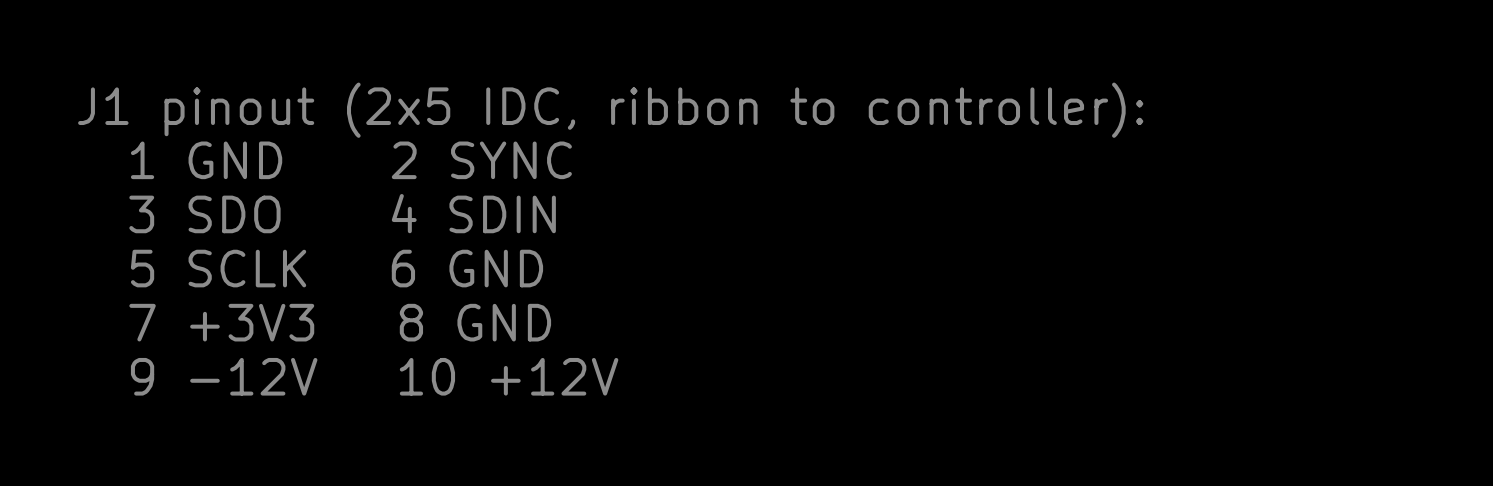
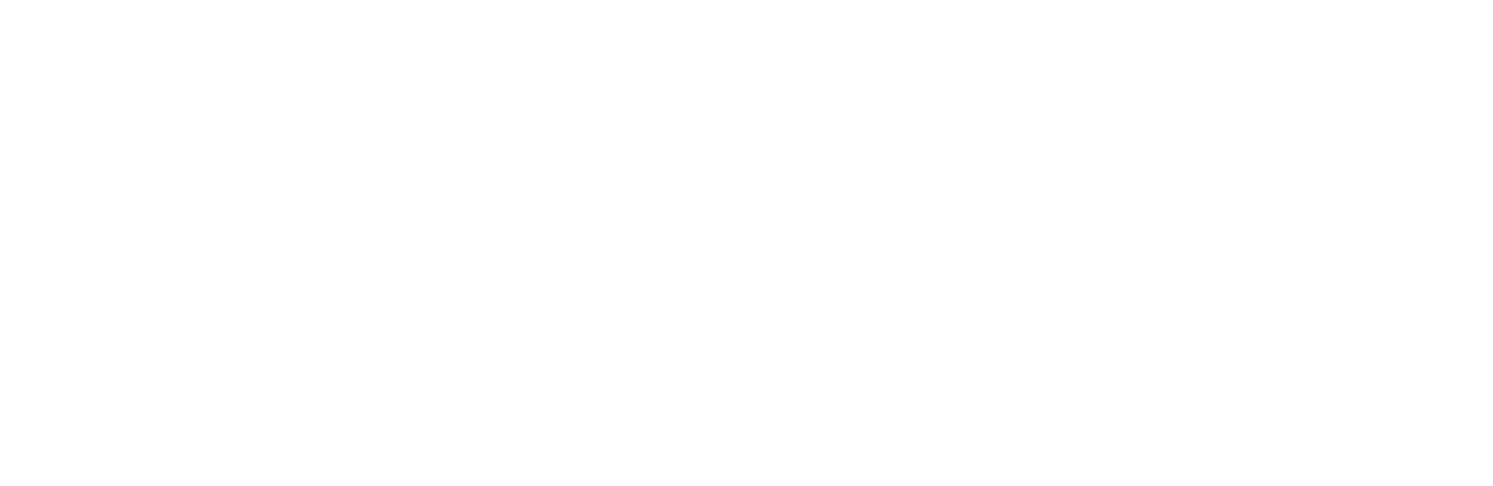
text: J1 pinout (2x5 IDC, ribbon to controller): (610, 110) -> none
text: 1 GND 2 SYNC (351, 160) -> none
text: 3 SDO 4 SDIN (342, 213) -> none
text: 5 SCLK 6 GND (337, 268) -> none
text: 7 +3V3 8 GND (340, 322) -> none
text: 9 -12V 10 +12V (374, 376) -> none

